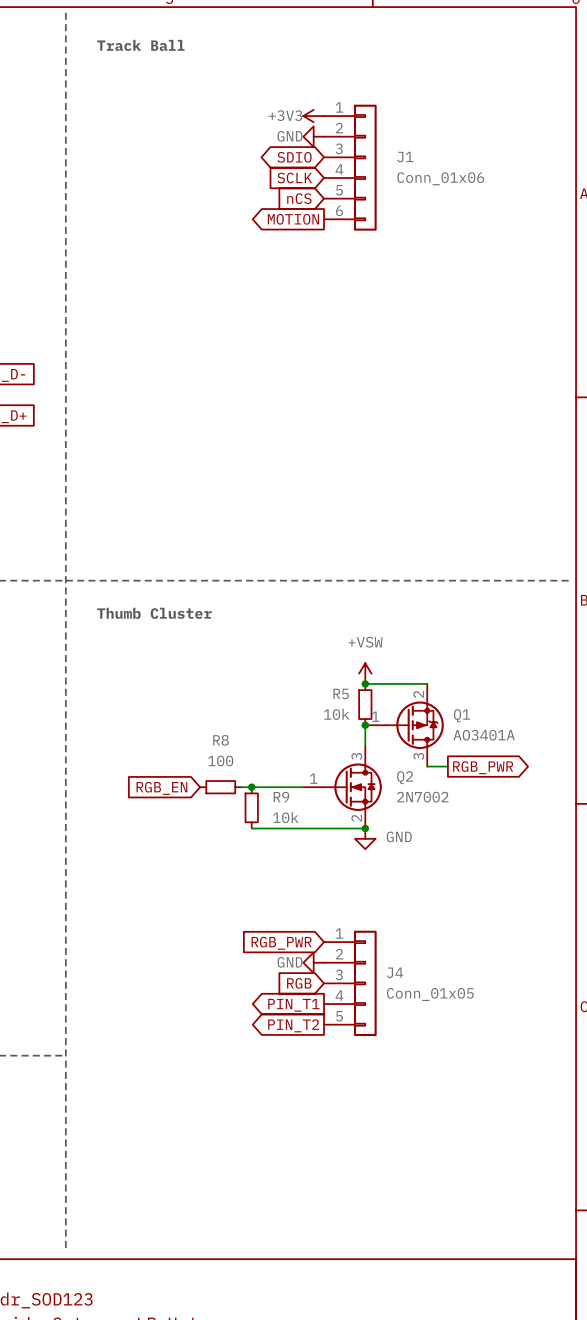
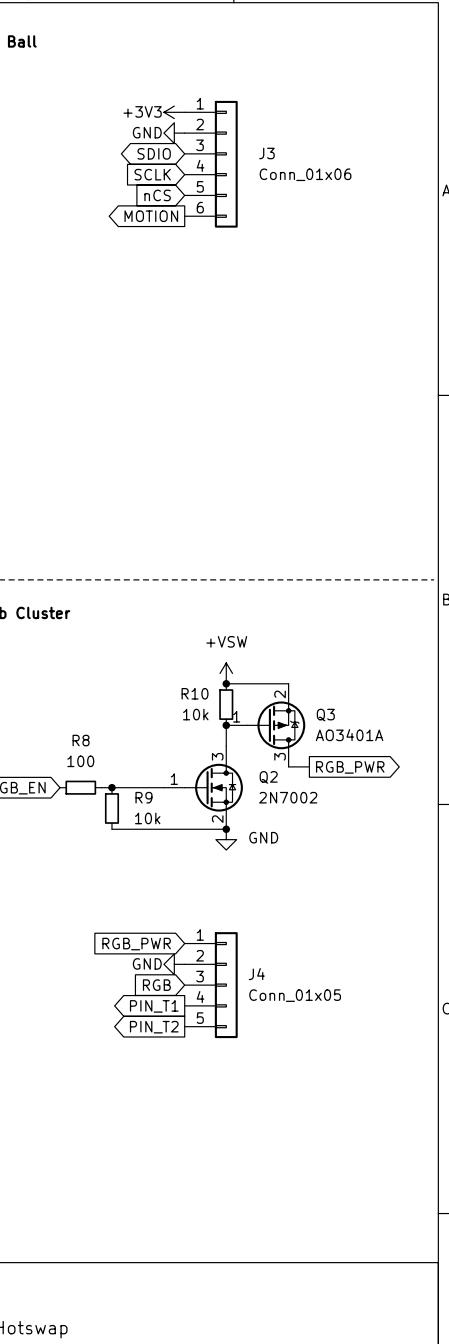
J1 name: J1 (405, 157) -> J3 (266, 153)
R5 name: R5 (341, 693) -> R10 (195, 693)
Q1 name: Q1 (462, 715) -> Q3 (325, 715)

